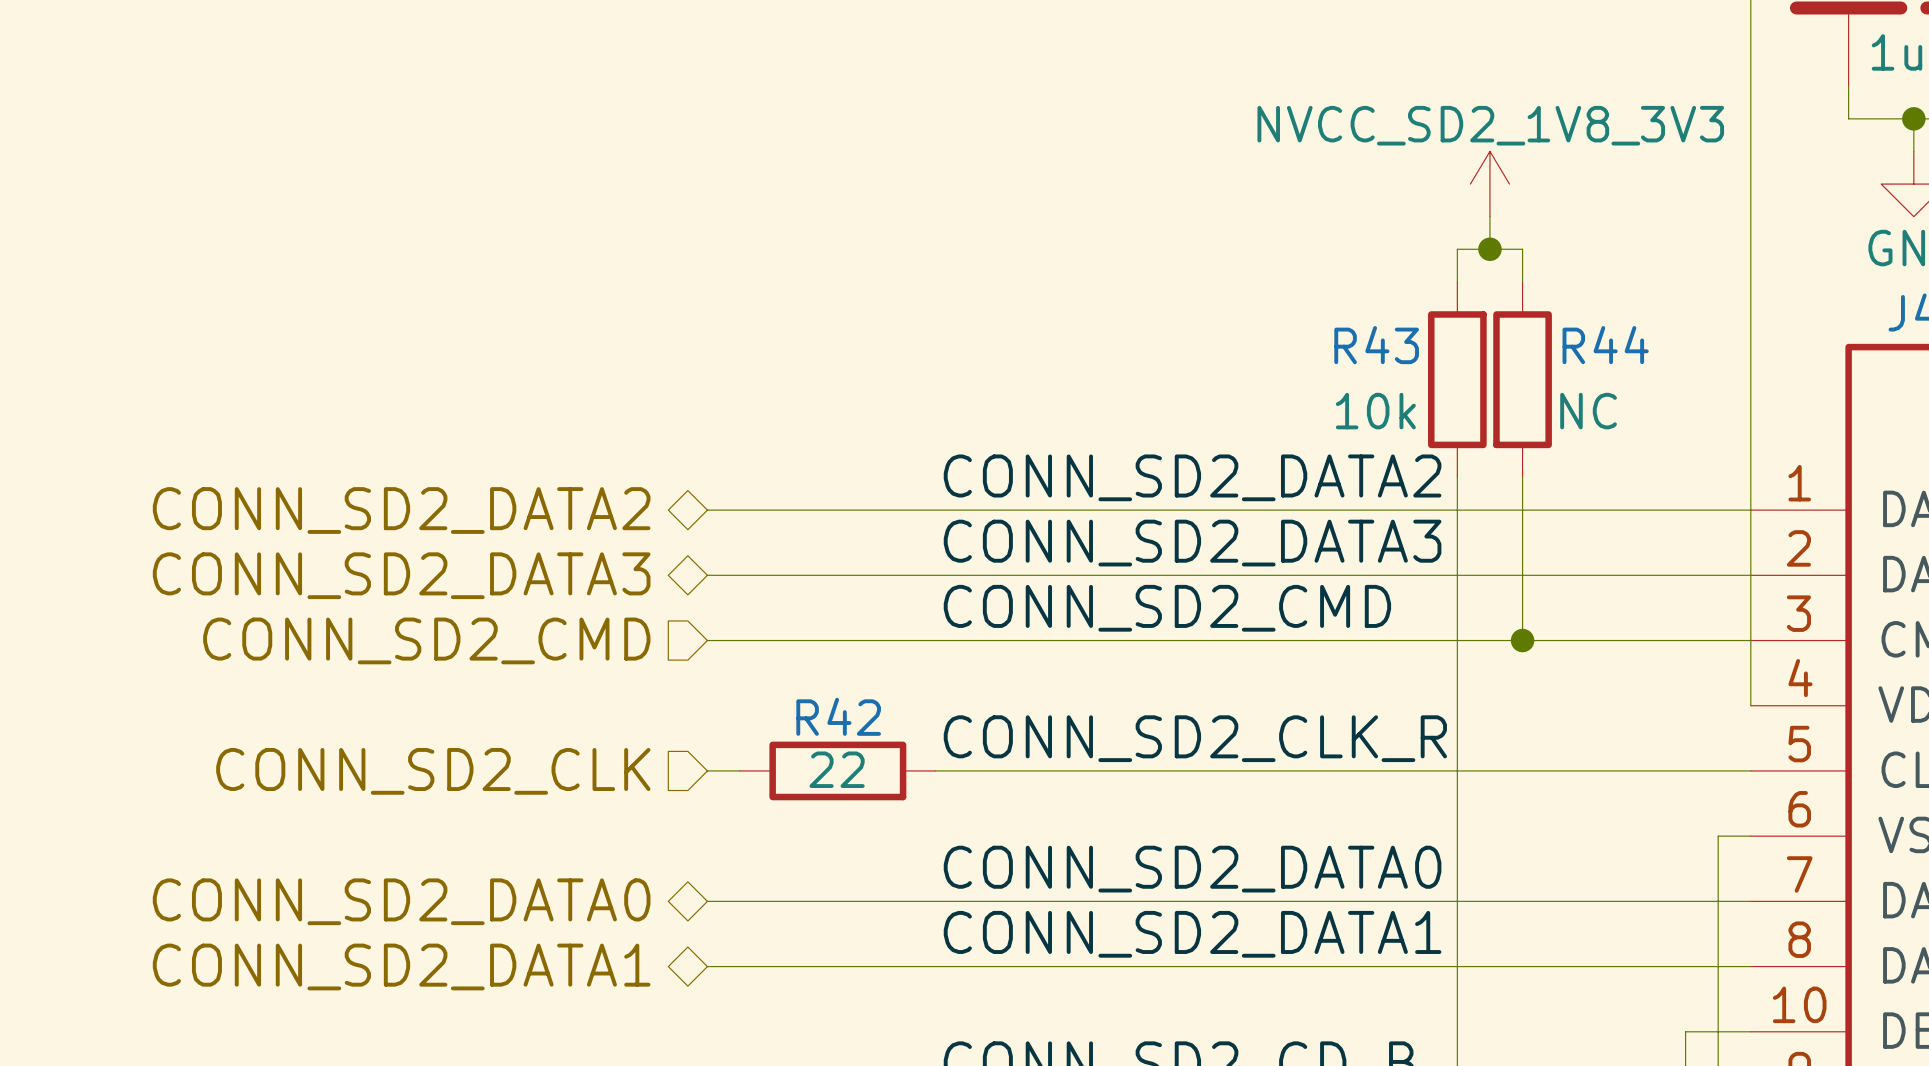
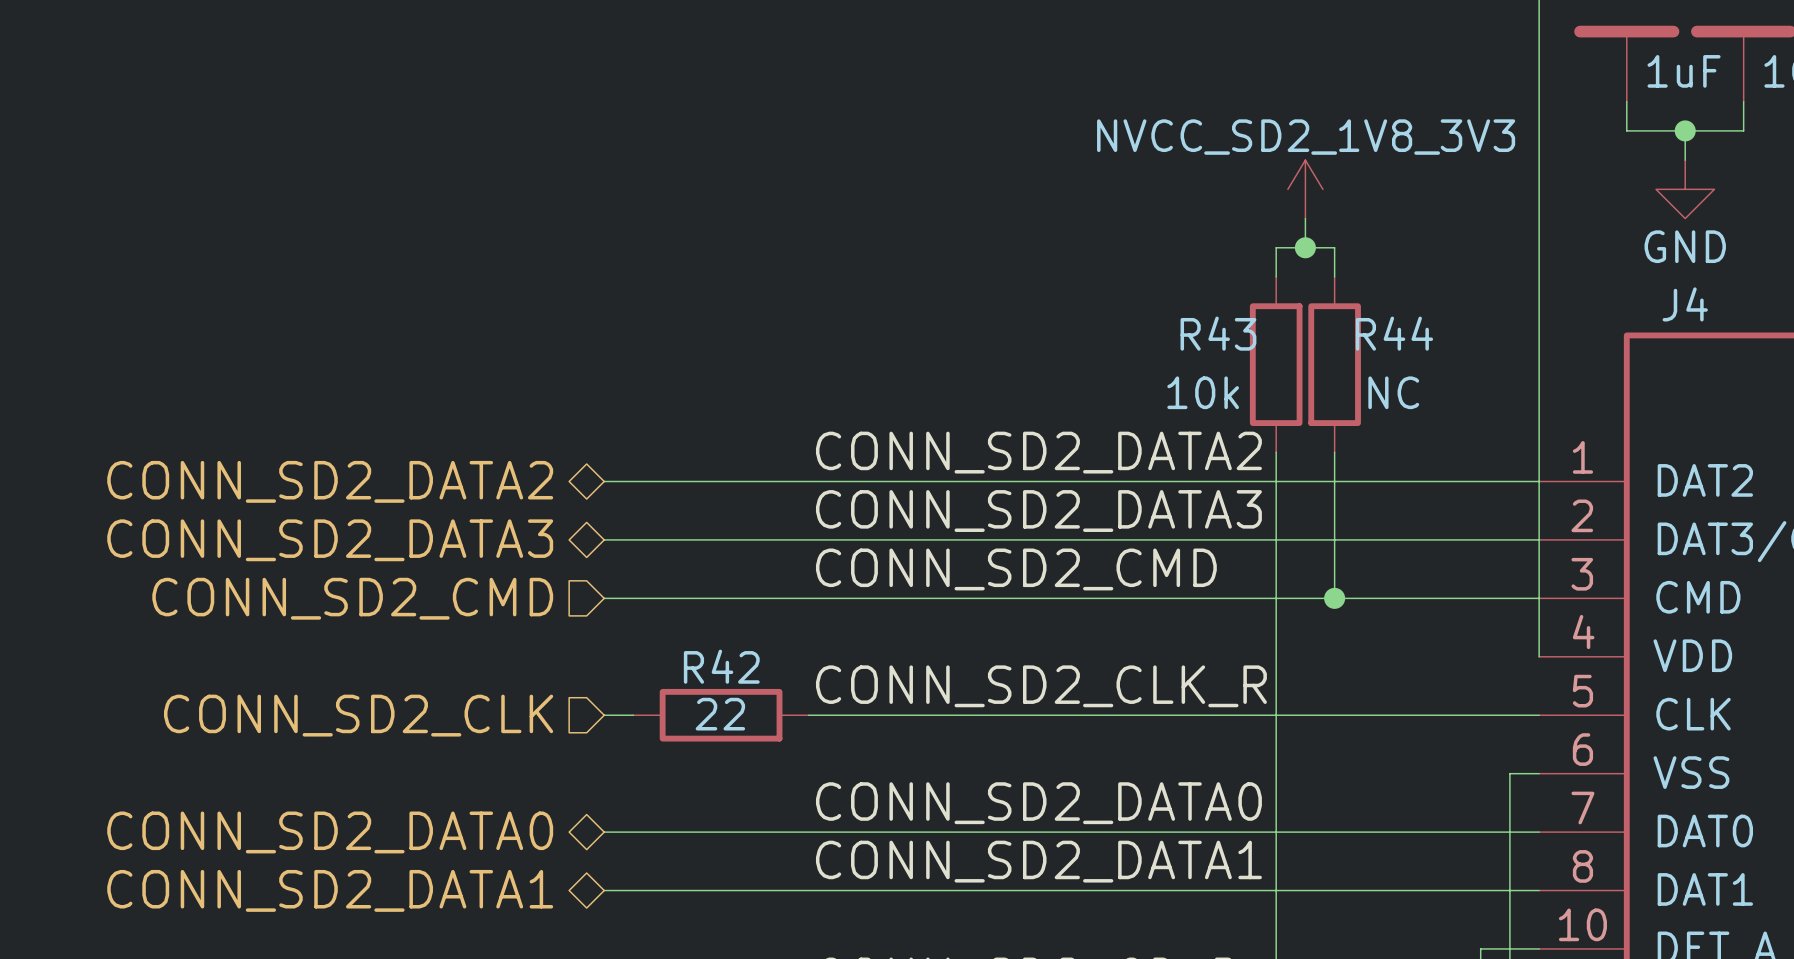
R43 name position: R43 (1376, 345) -> R43 (1218, 333)
R44 name position: R44 (1605, 345) -> R44 (1394, 333)

